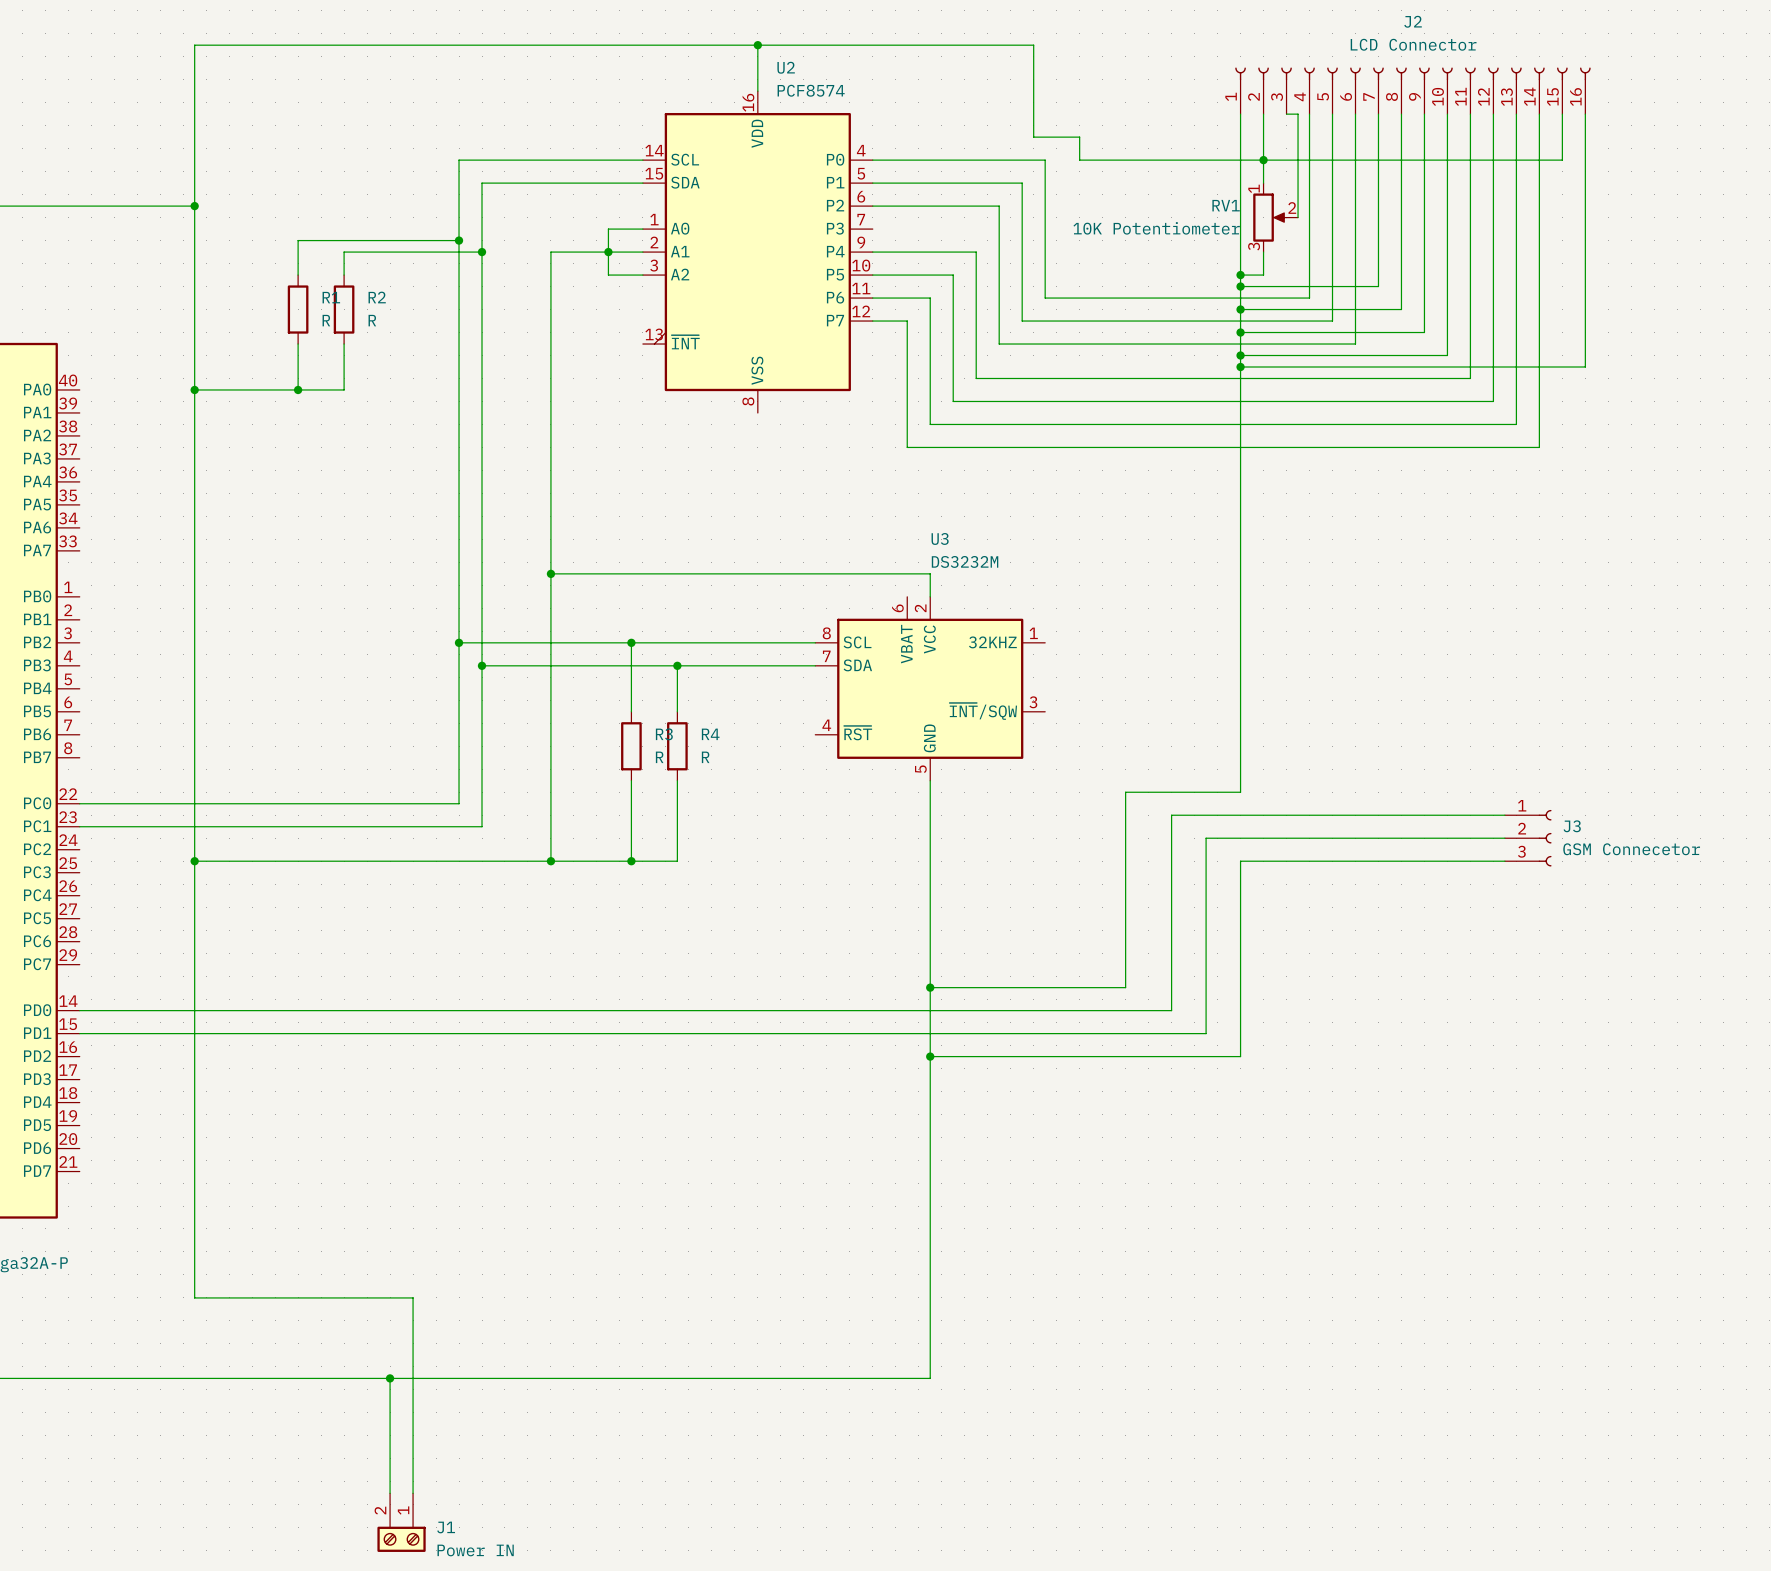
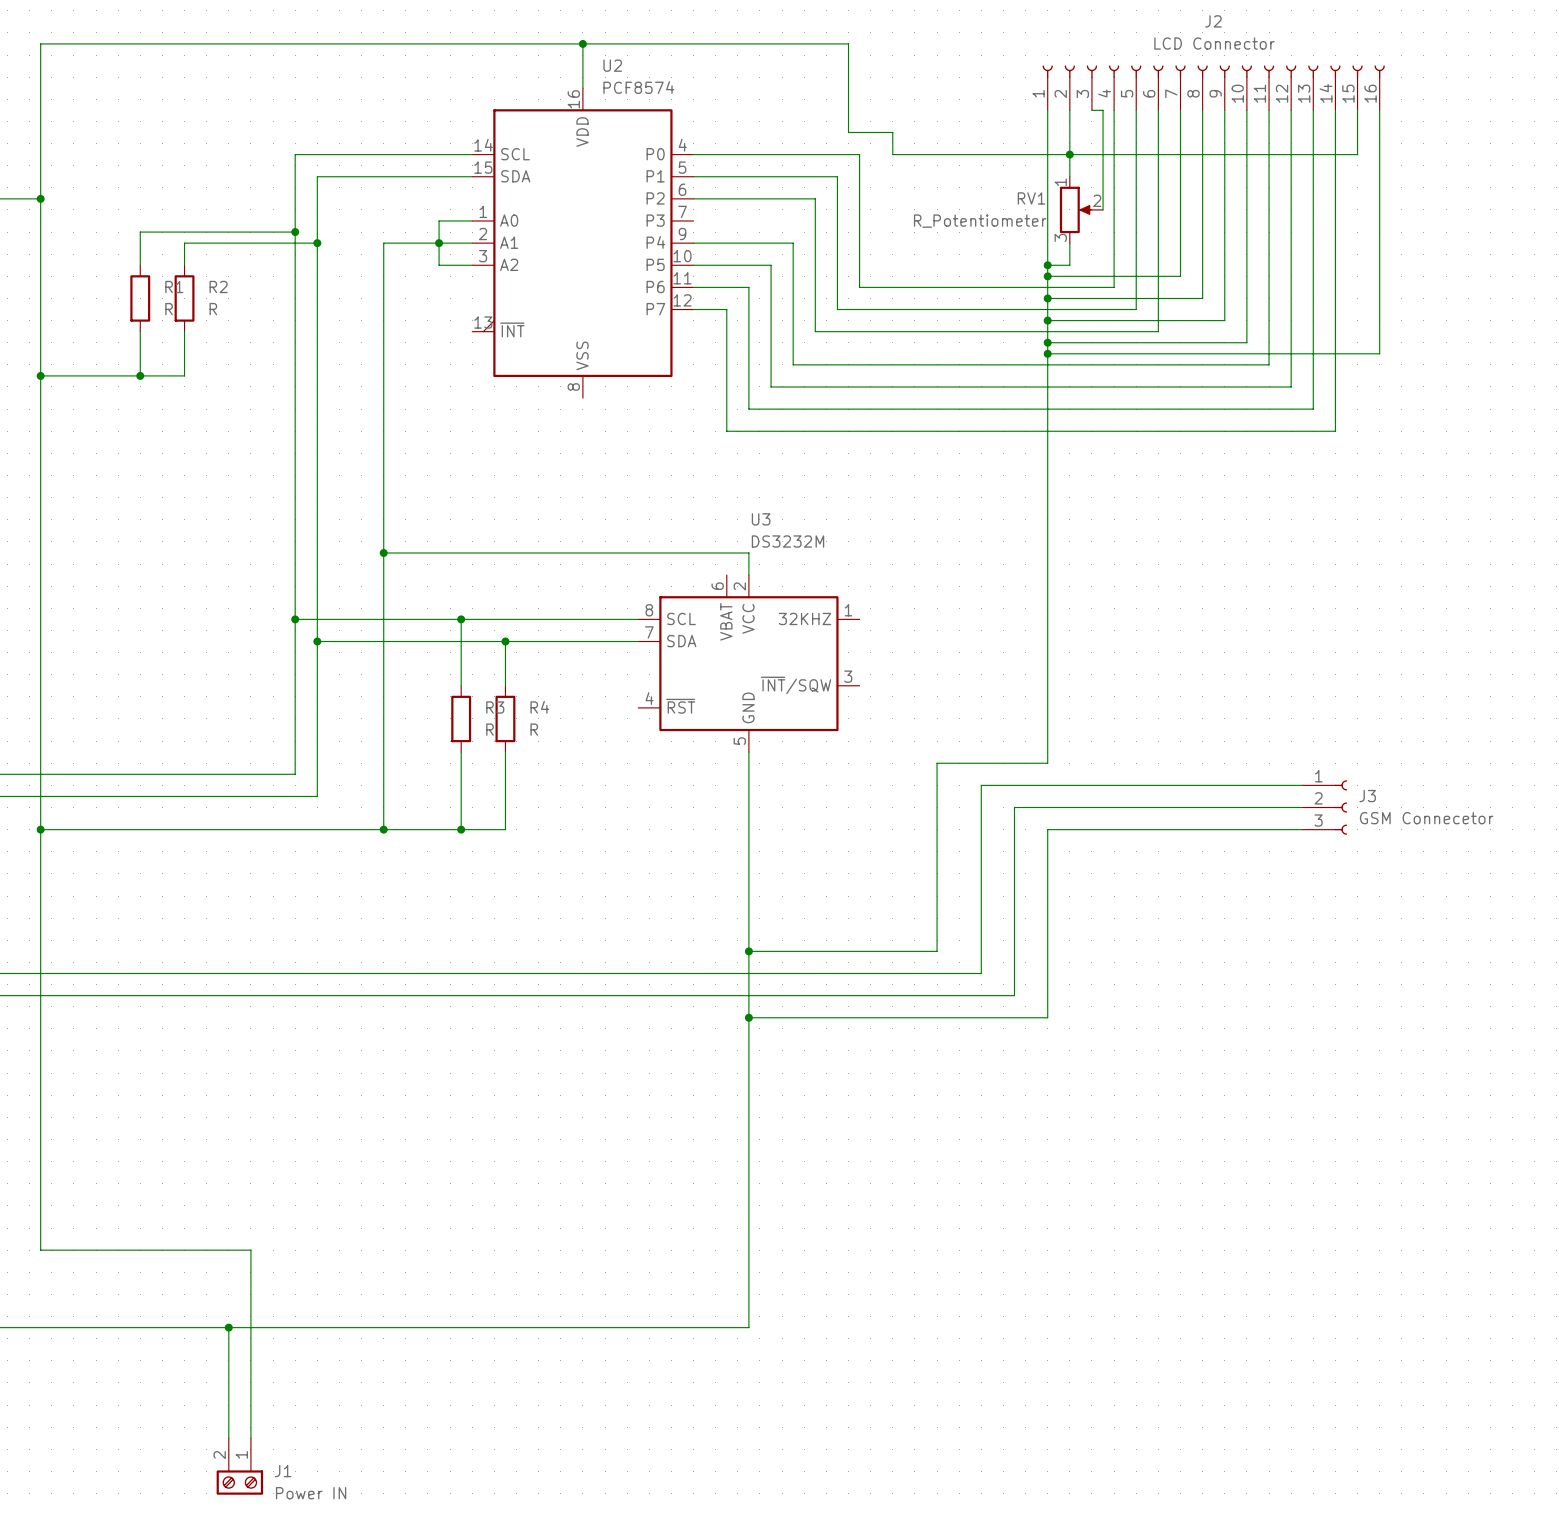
RV1 value: 10K Potentiometer (1156, 228) -> R_Potentiometer (980, 221)

